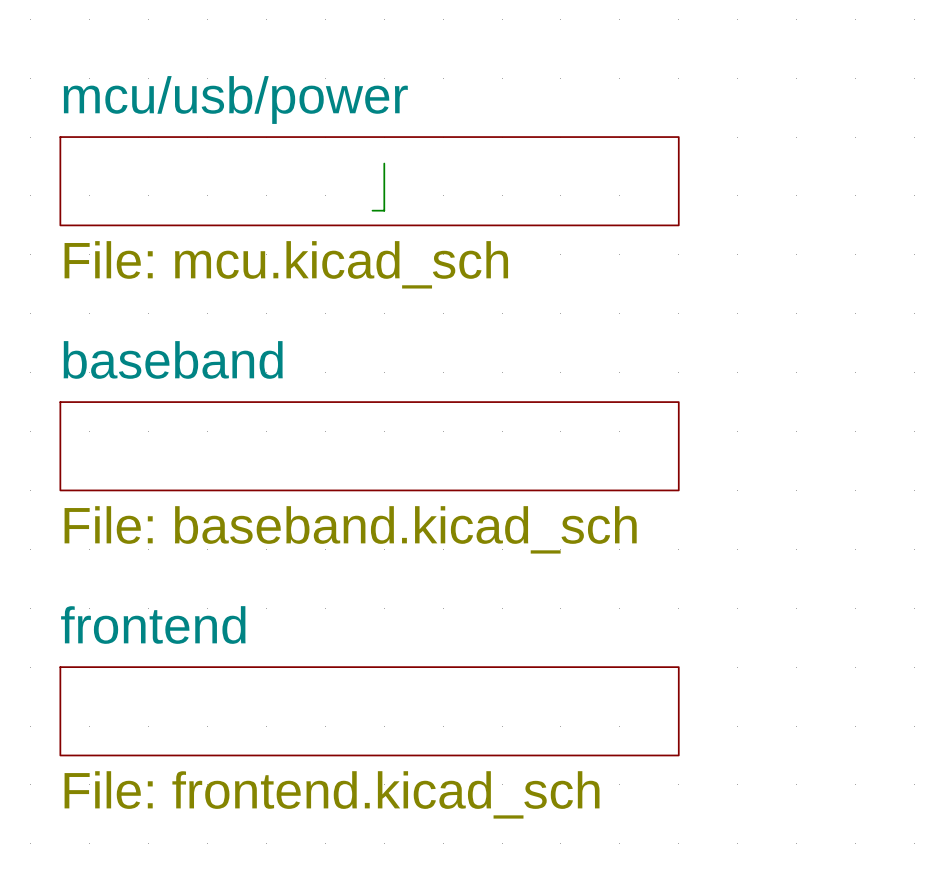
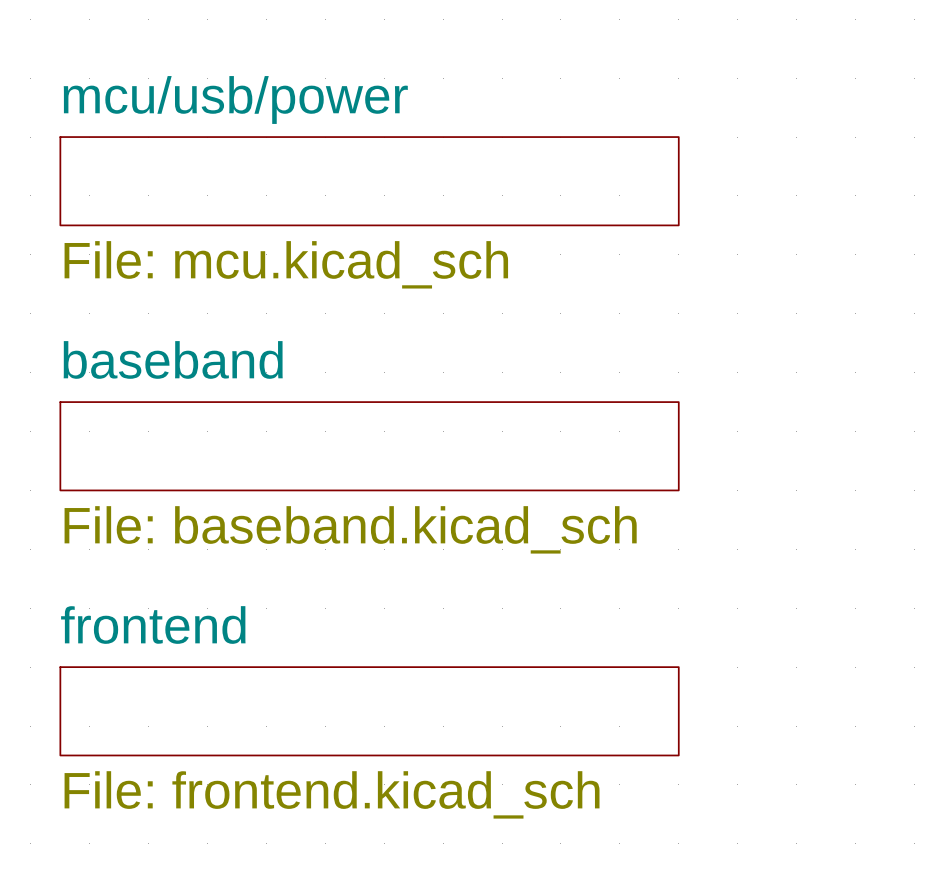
wire: (384, 163) (384, 210) (372, 210) -> none

